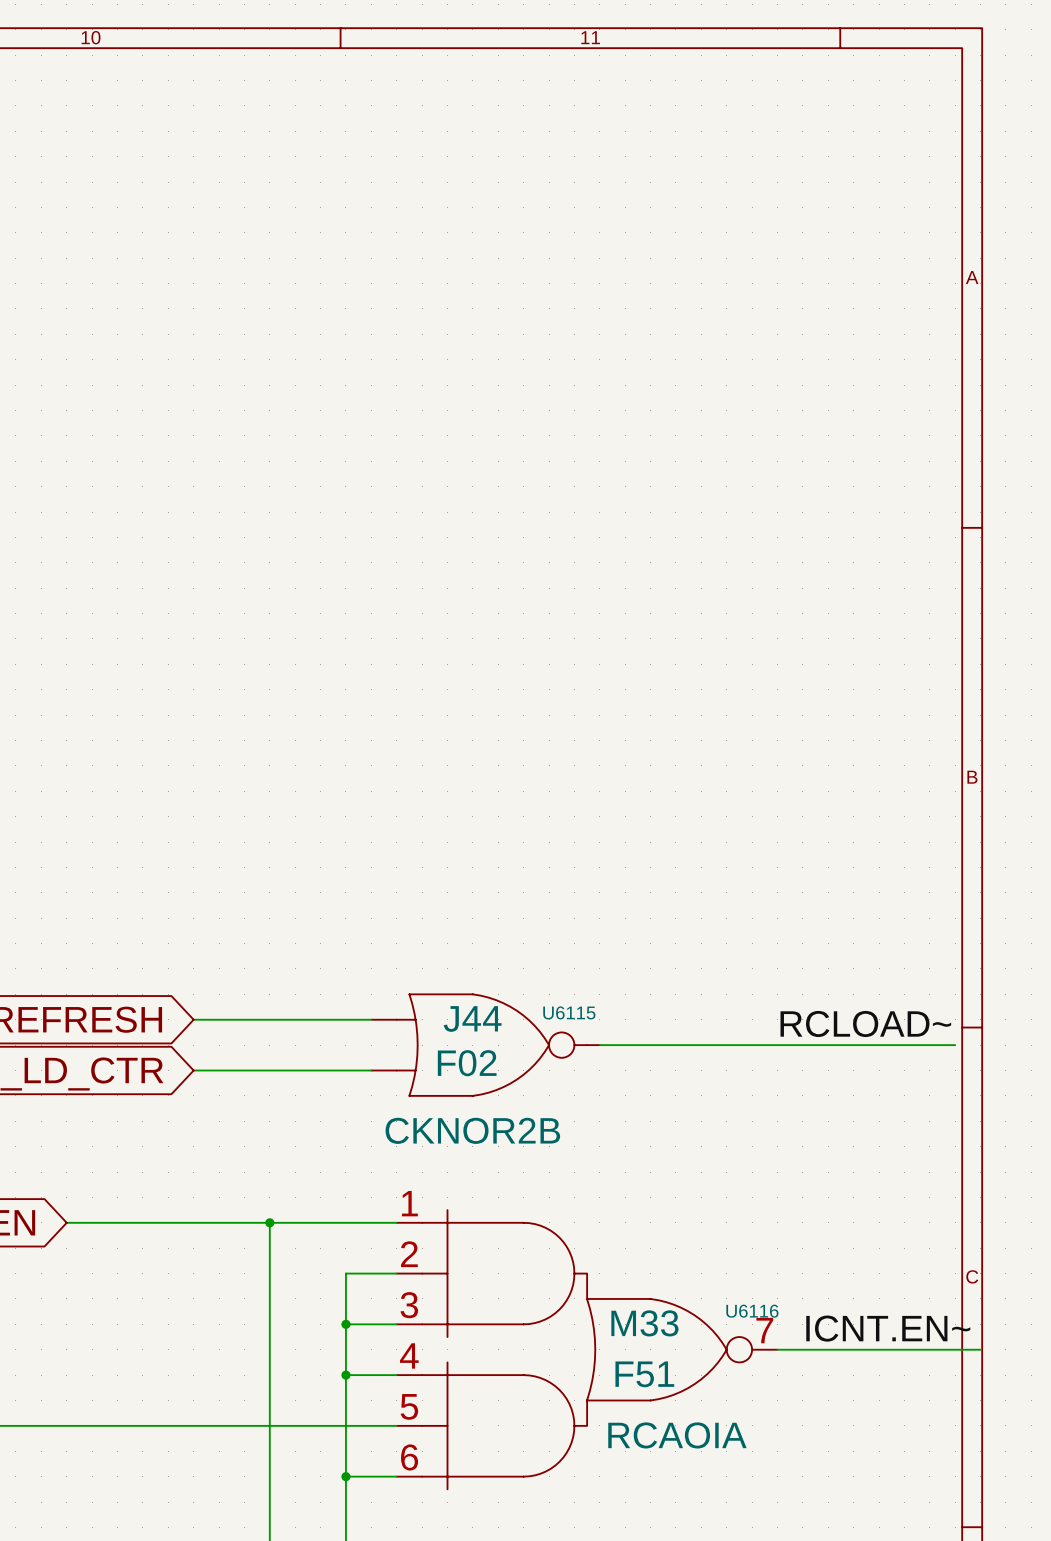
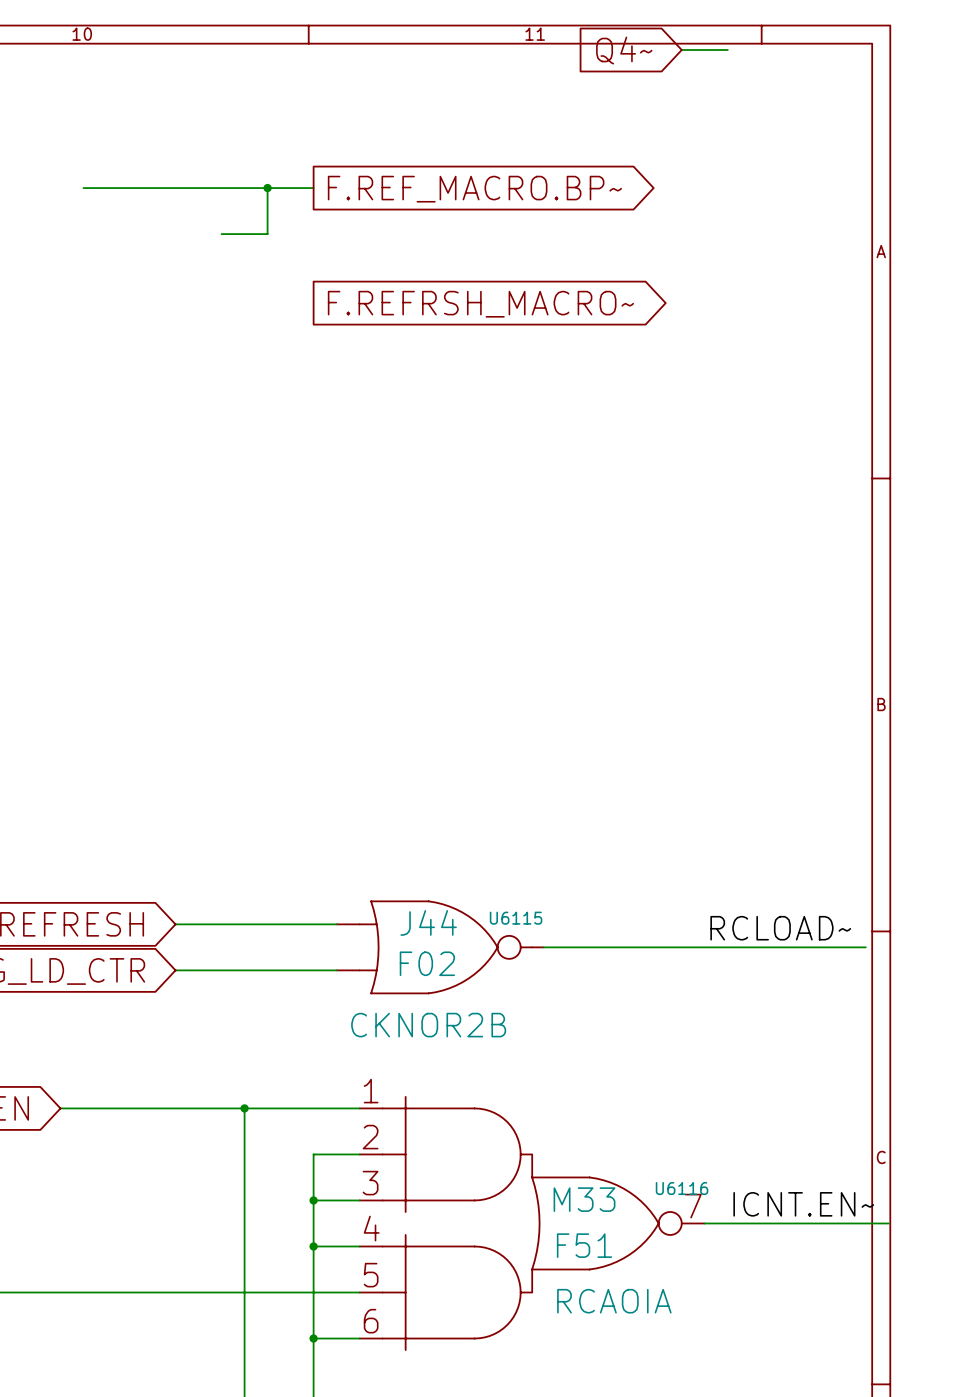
wire: none -> (681, 50) (727, 50)
global label: none -> Q4~ (624, 50)
wire: none -> (83, 188) (313, 188)
wire: none -> (267, 188) (267, 234) (221, 234)
junction: none -> (267, 188)
global label: none -> F.REF_MACRO.BP~ (474, 189)
global label: none -> F.REFRSH_MACRO~ (480, 304)

